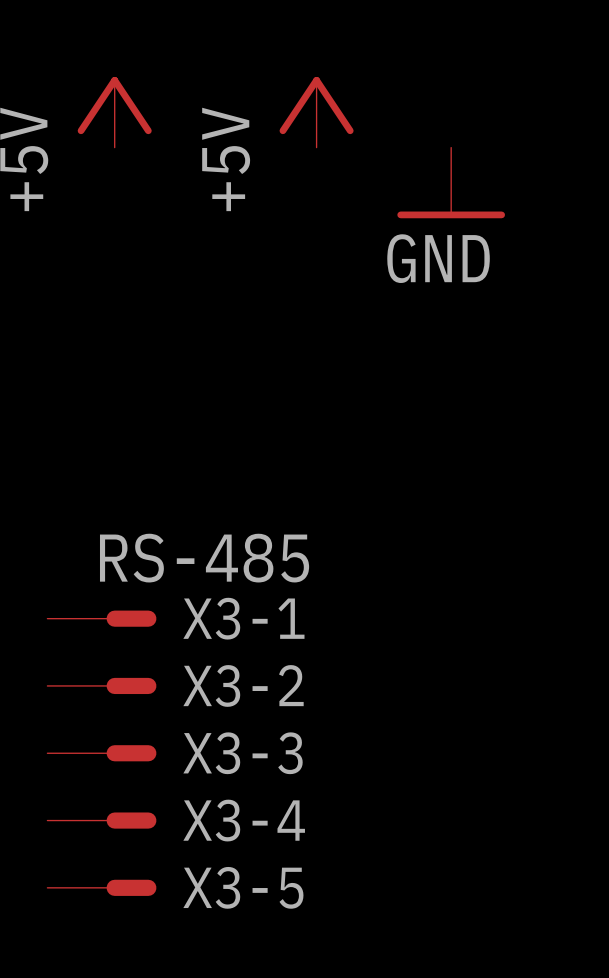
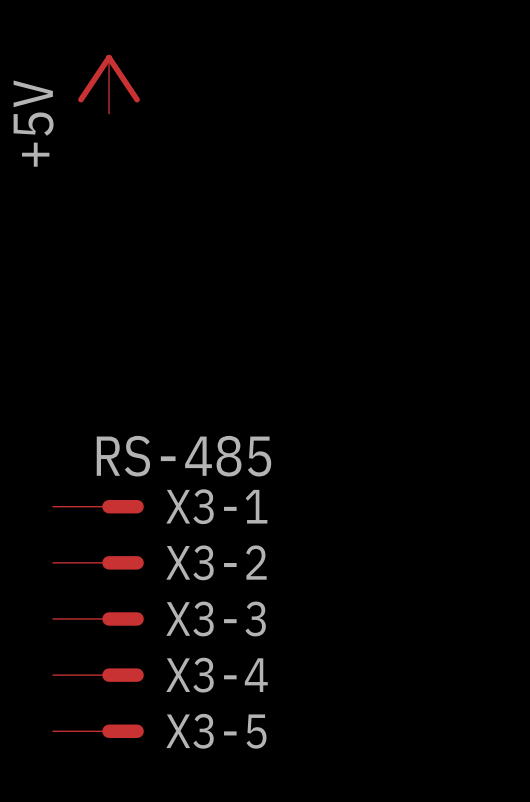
power symbol: +5V (316, 112) -> none
power symbol: GND (451, 182) -> none

